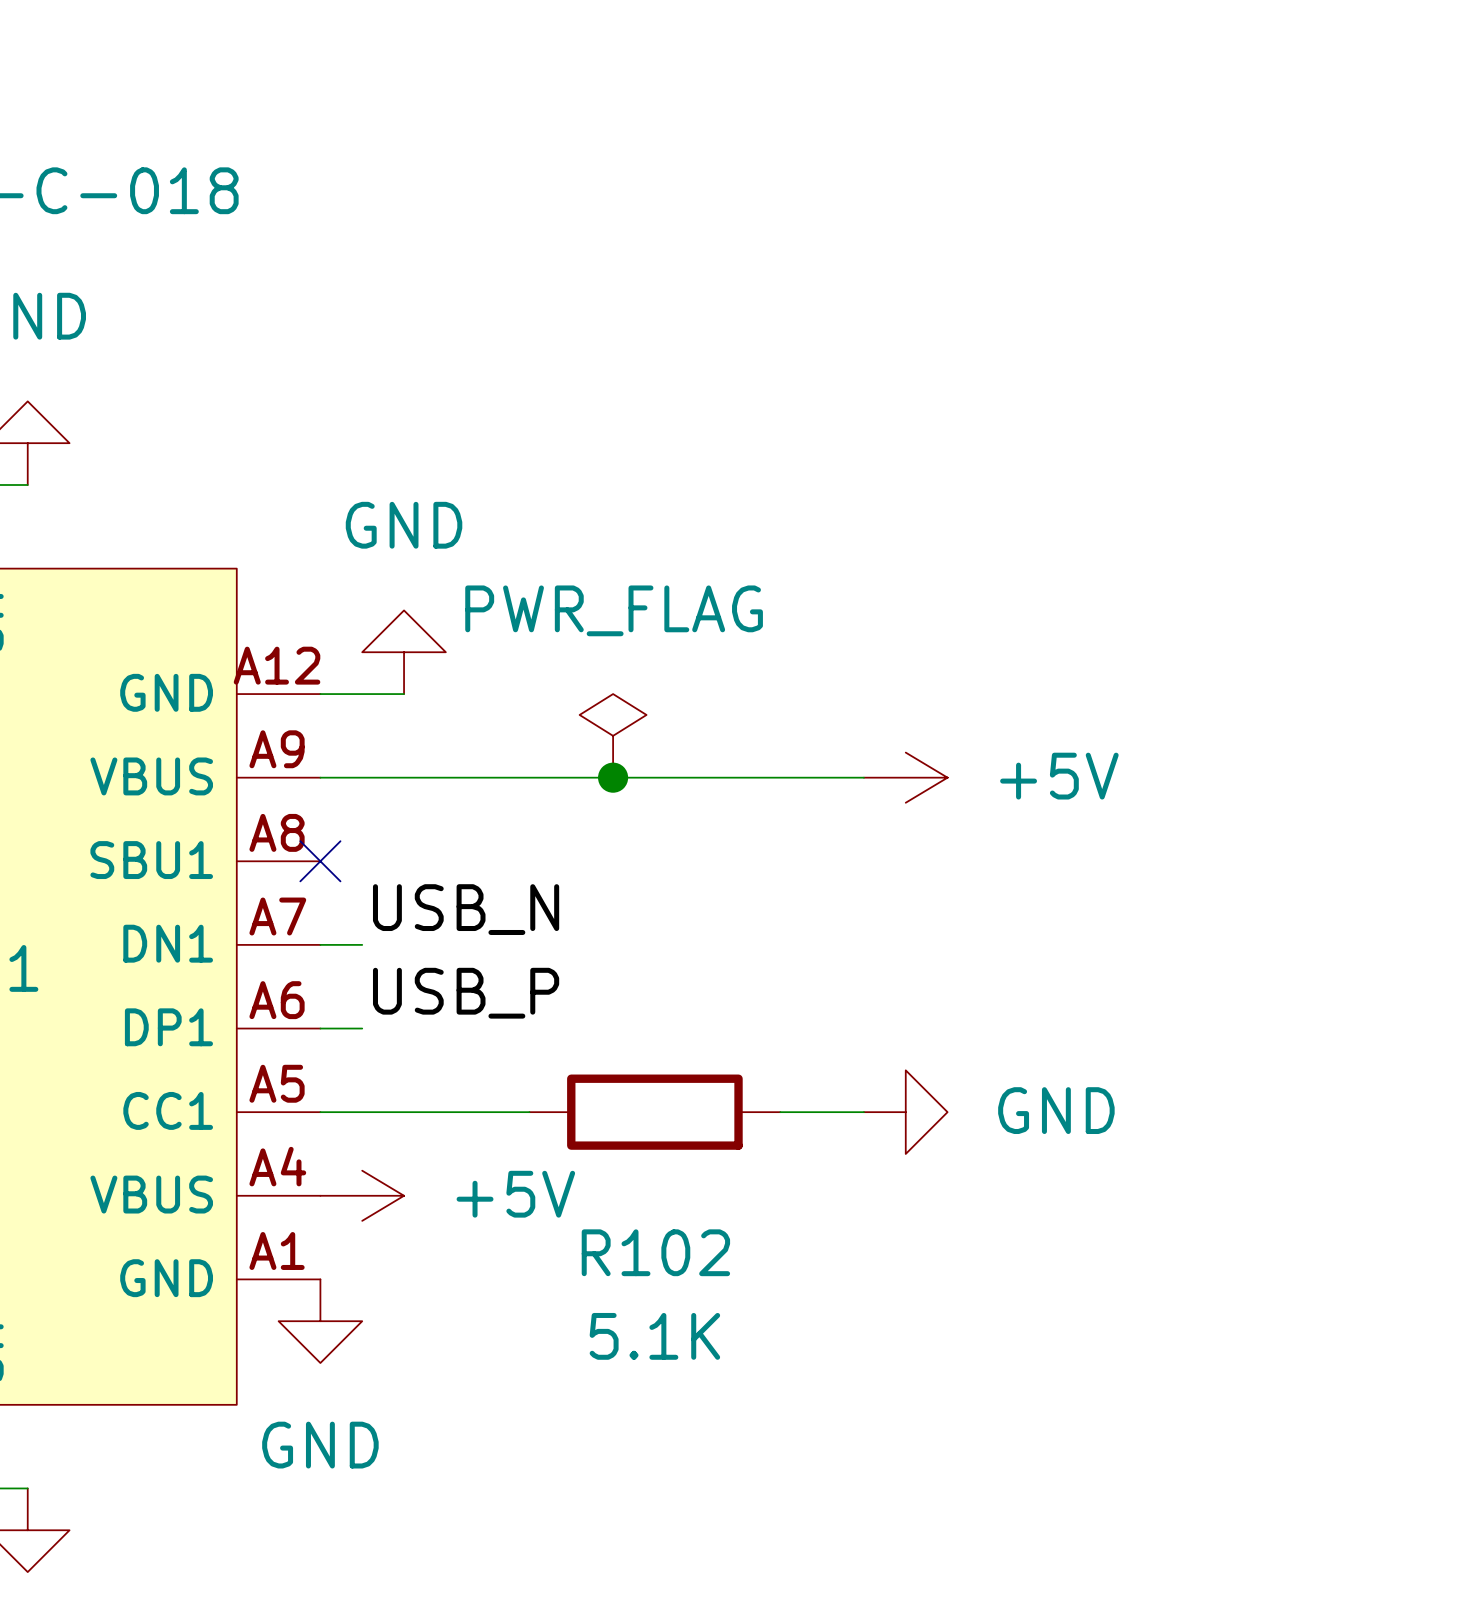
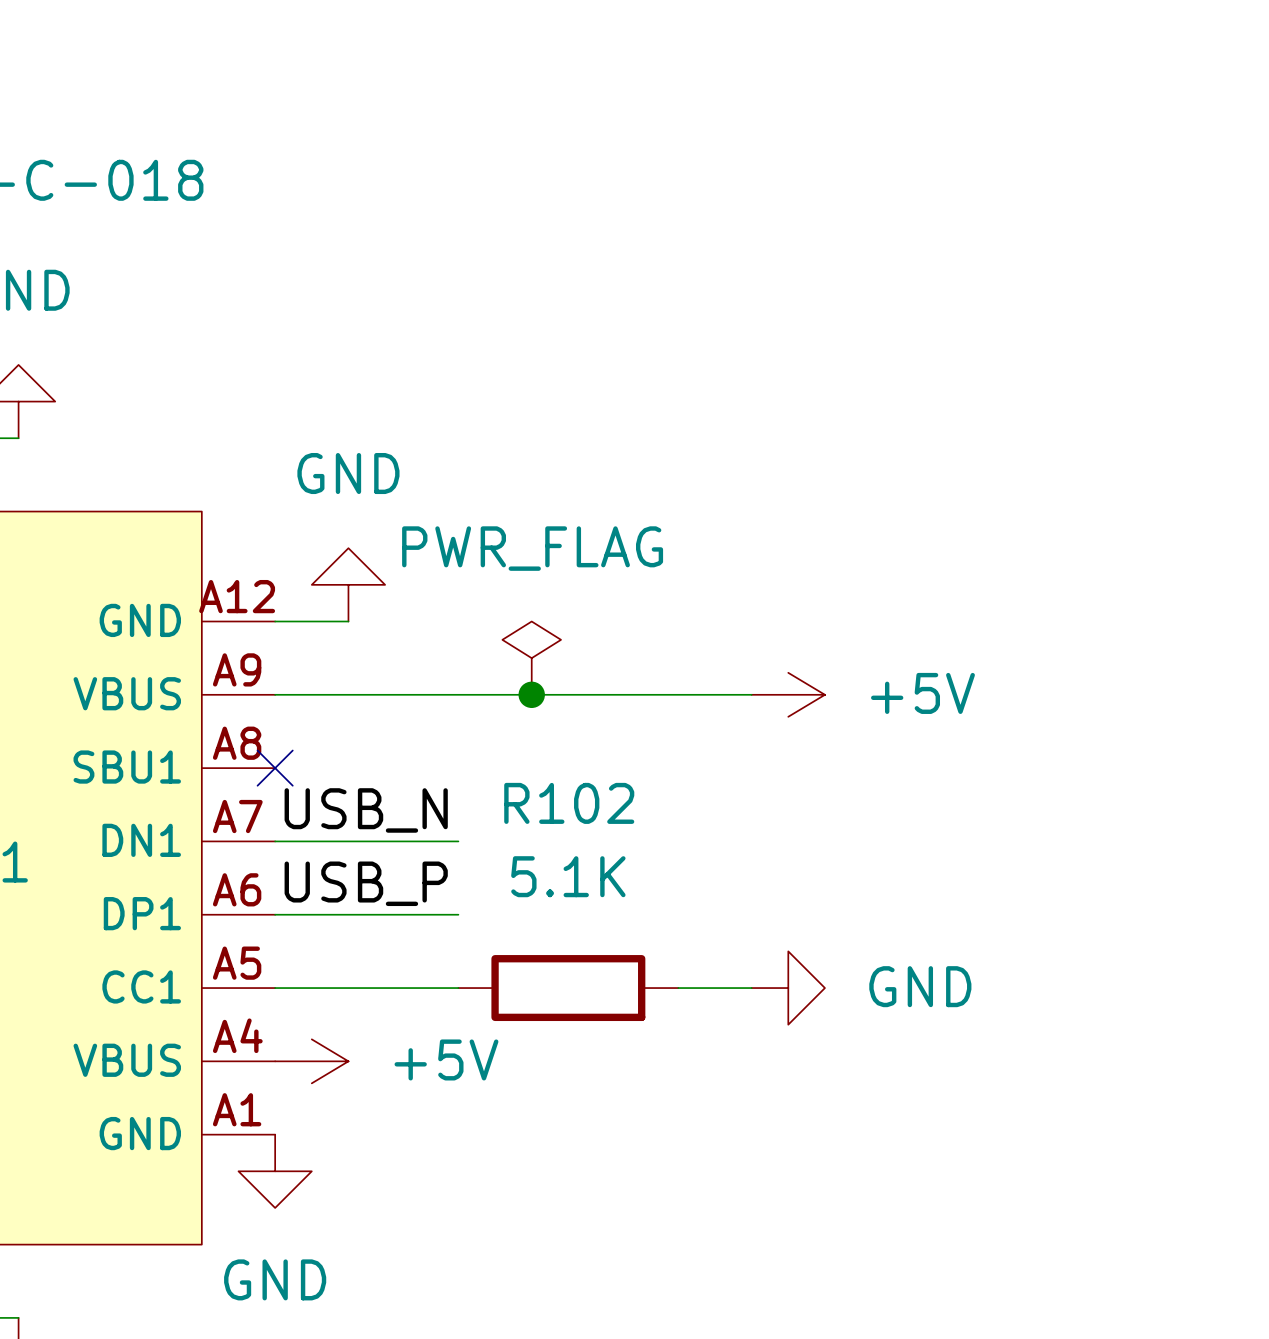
label position: USB_N (466, 909) -> USB_N (366, 810)
wire: none -> (311, 841) (458, 841)
label position: USB_P (466, 993) -> USB_P (366, 883)
wire: none -> (311, 914) (458, 914)
R102 name position: R102 (655, 1252) -> R102 (569, 803)
R102 value position: 5.1K (654, 1336) -> 5.1K (568, 876)

